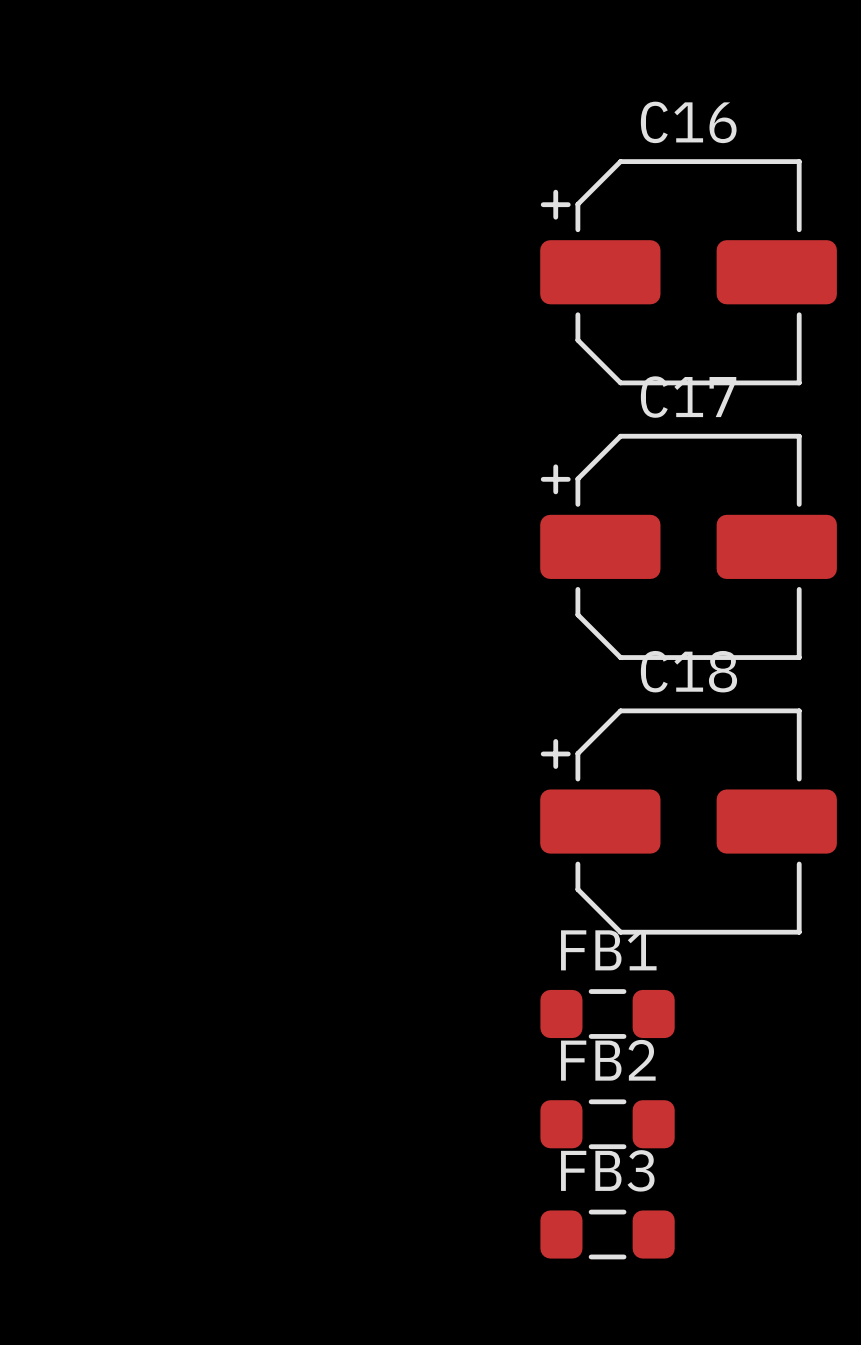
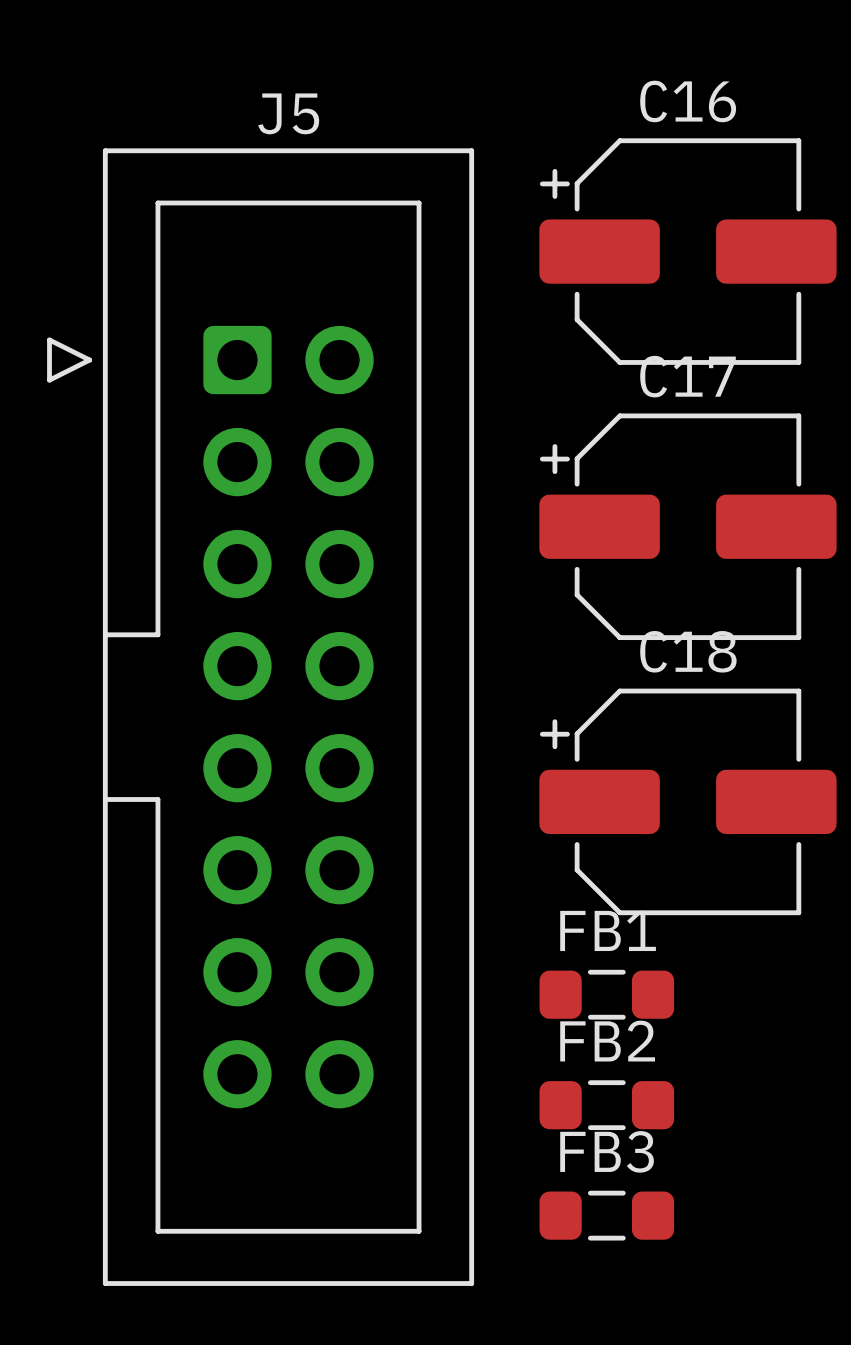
J5: none -> (260, 717)

